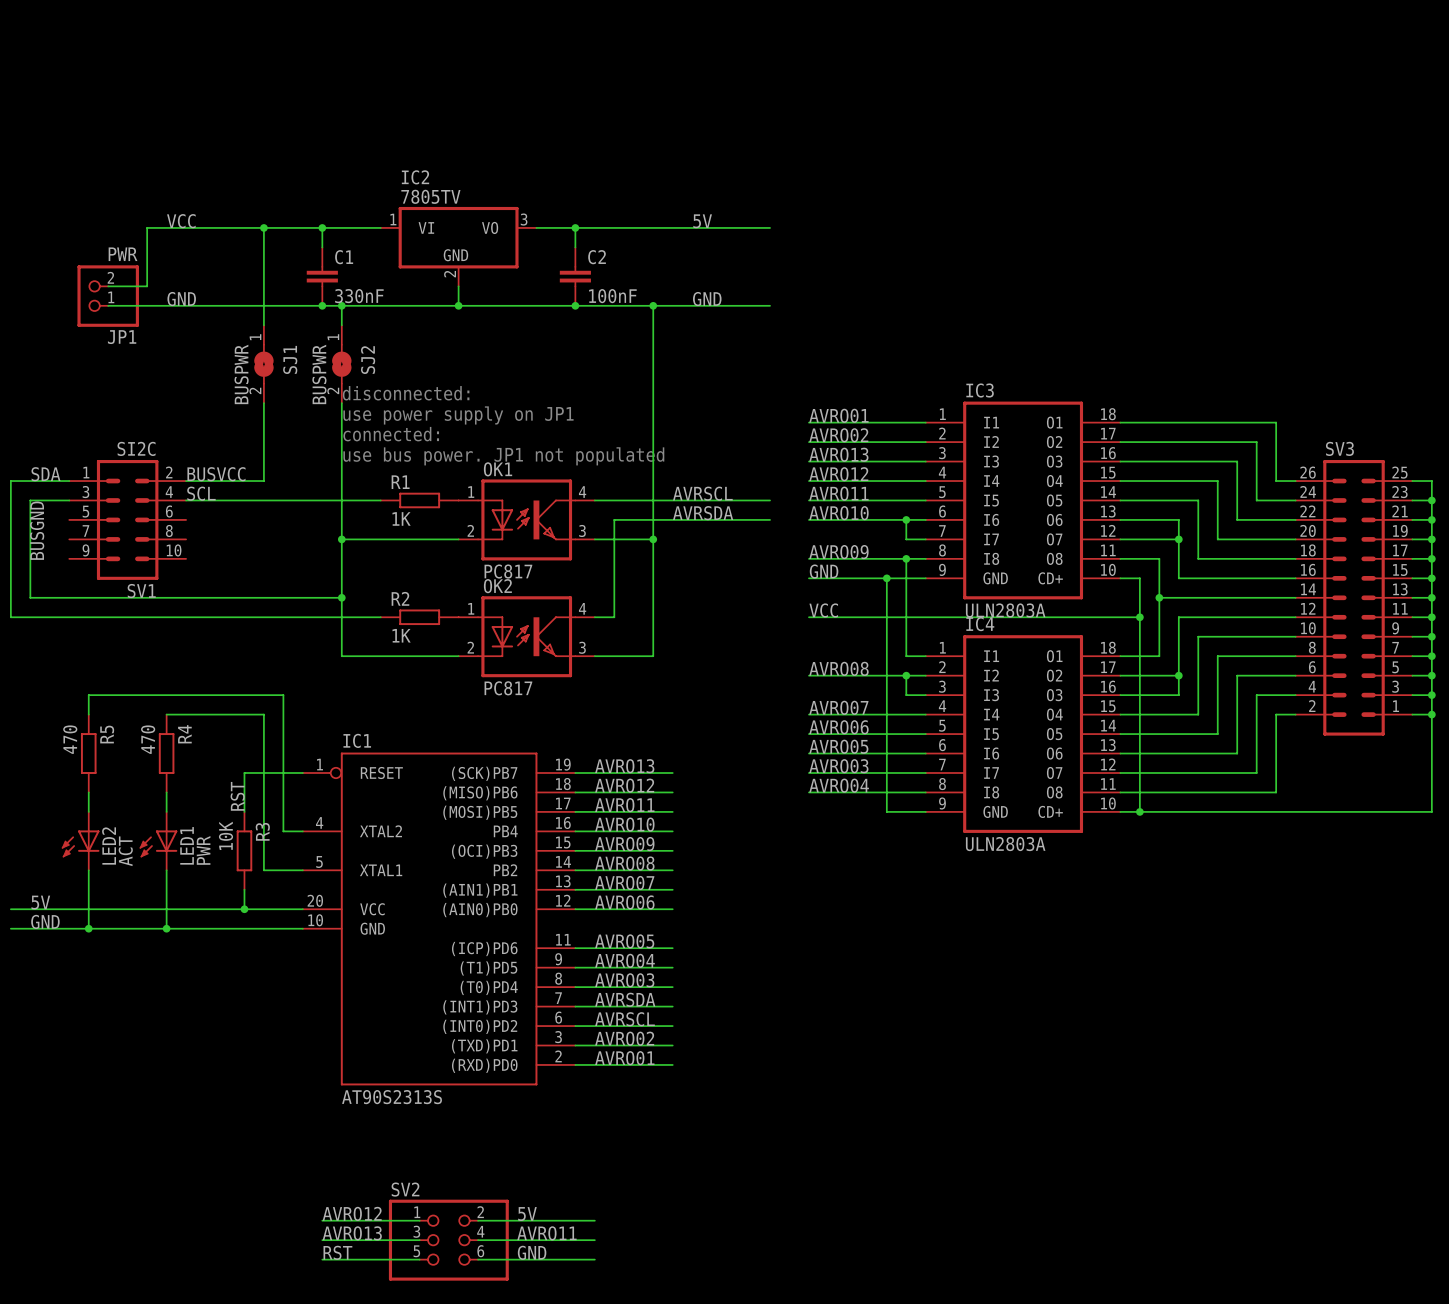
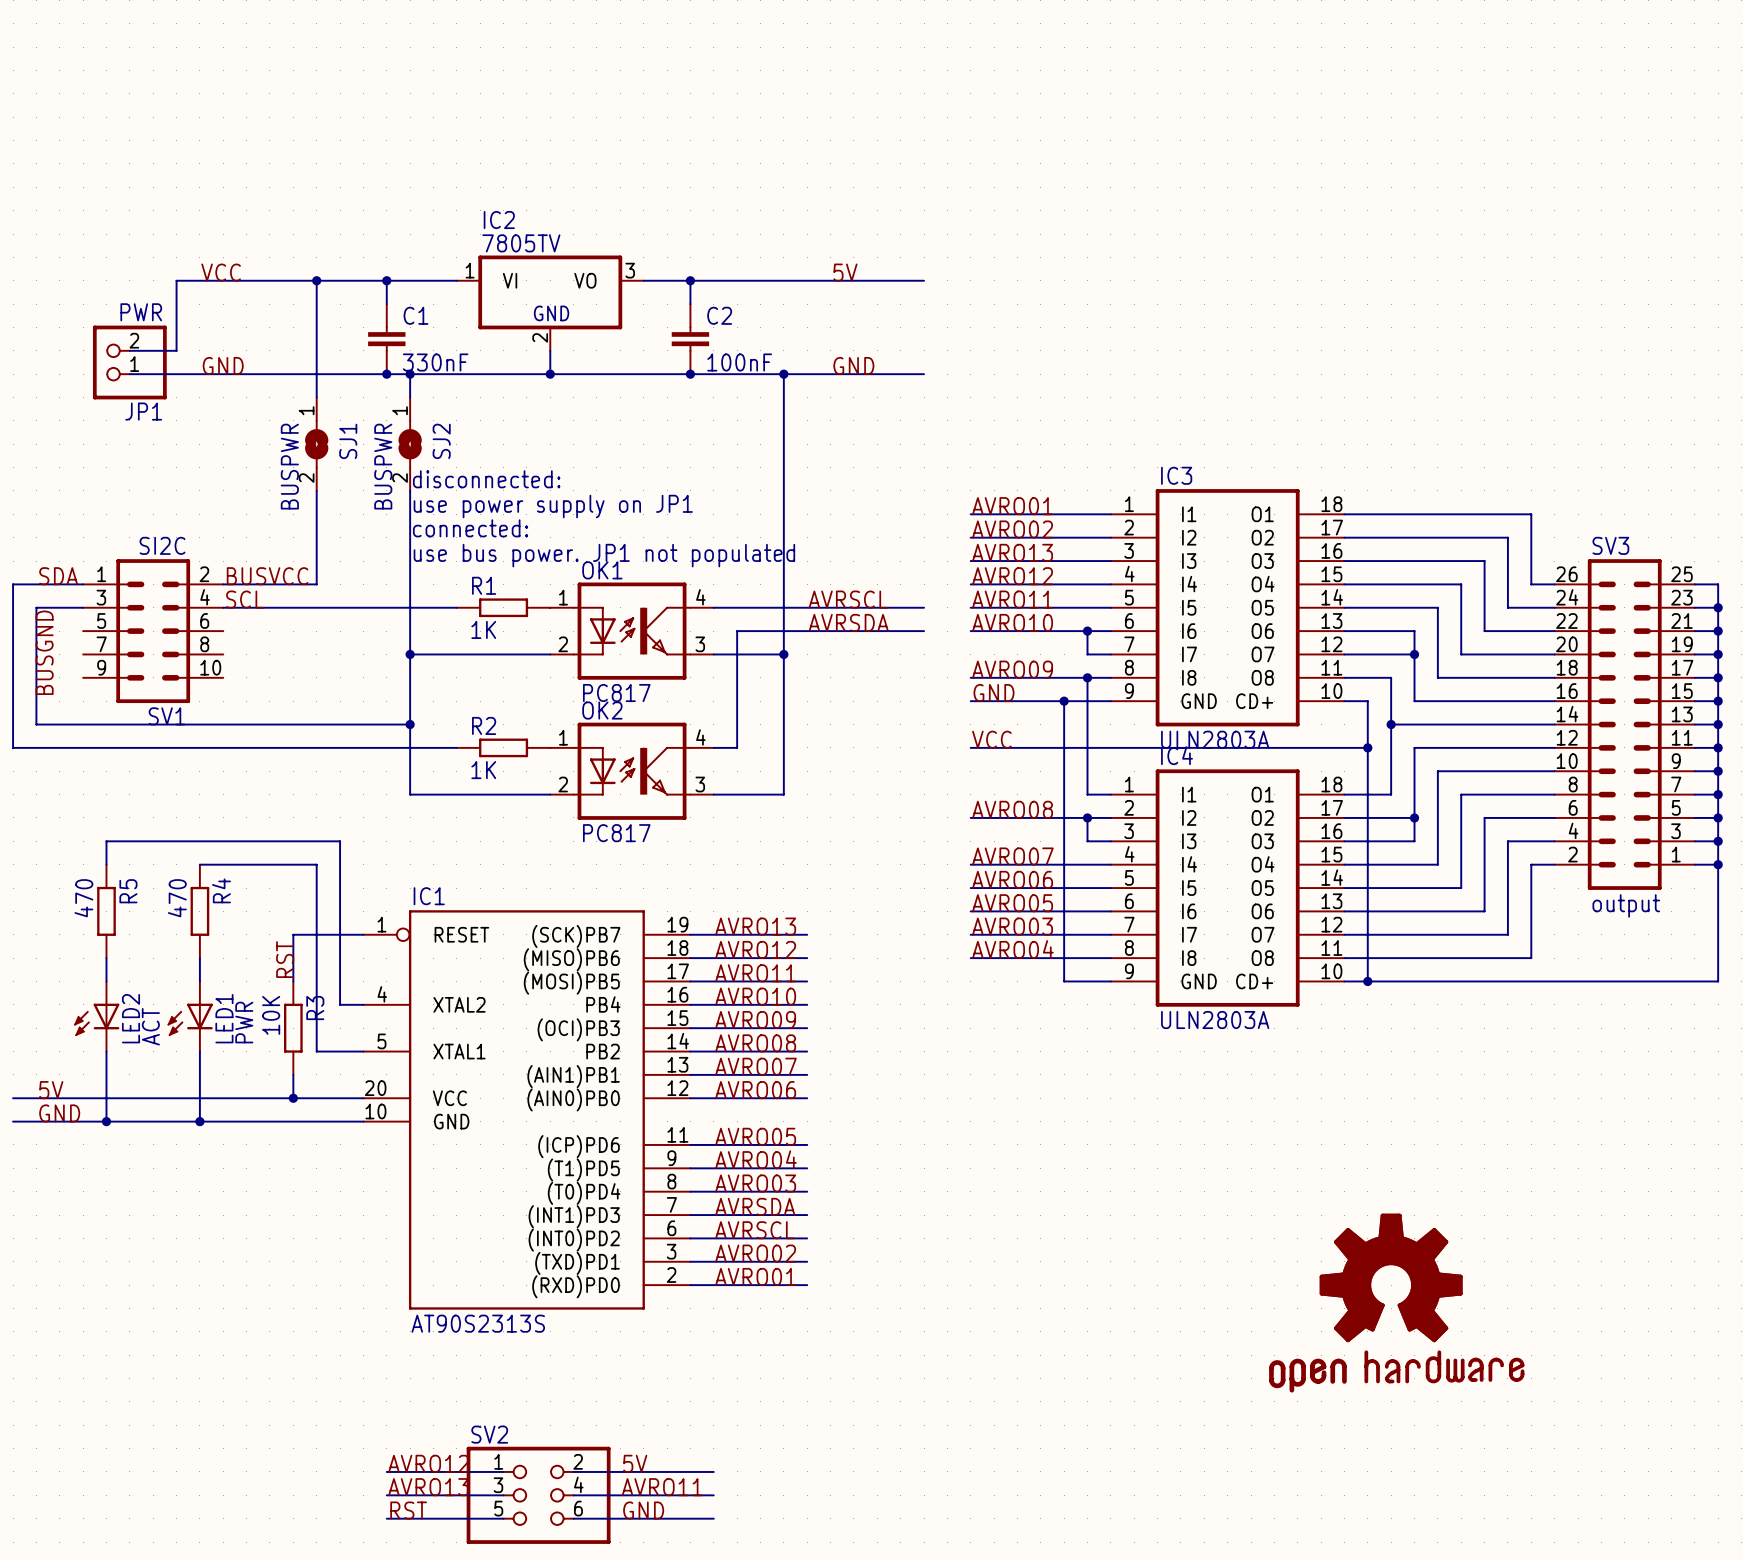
SV3 value: none -> output (1626, 905)
part: none -> (1396, 1303)

